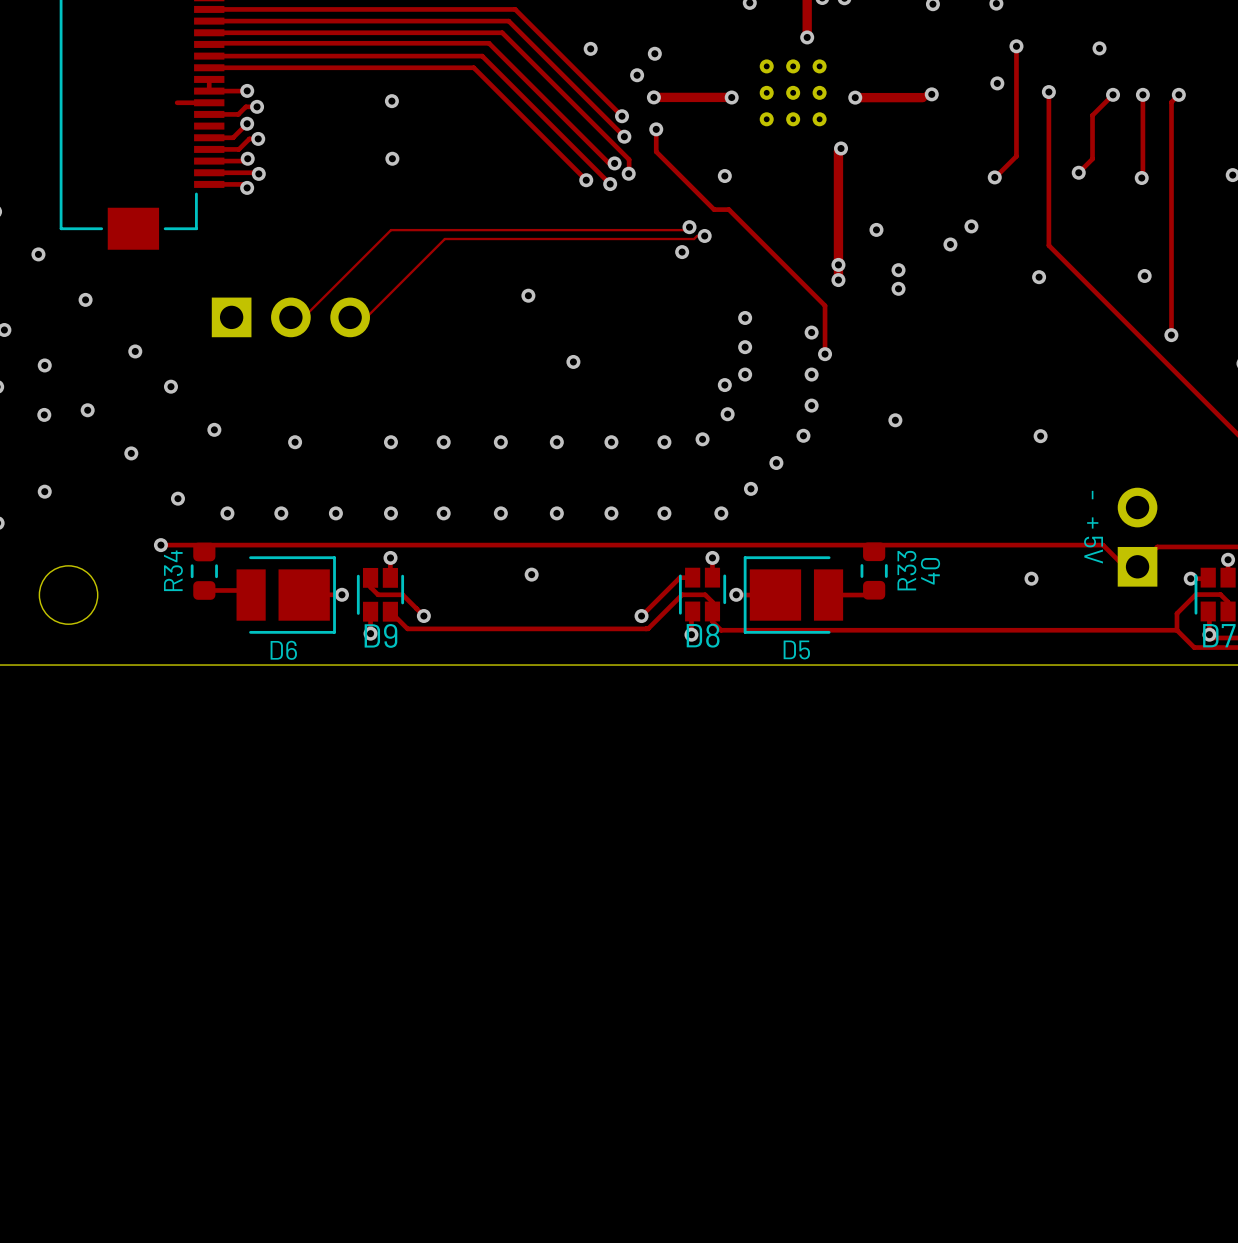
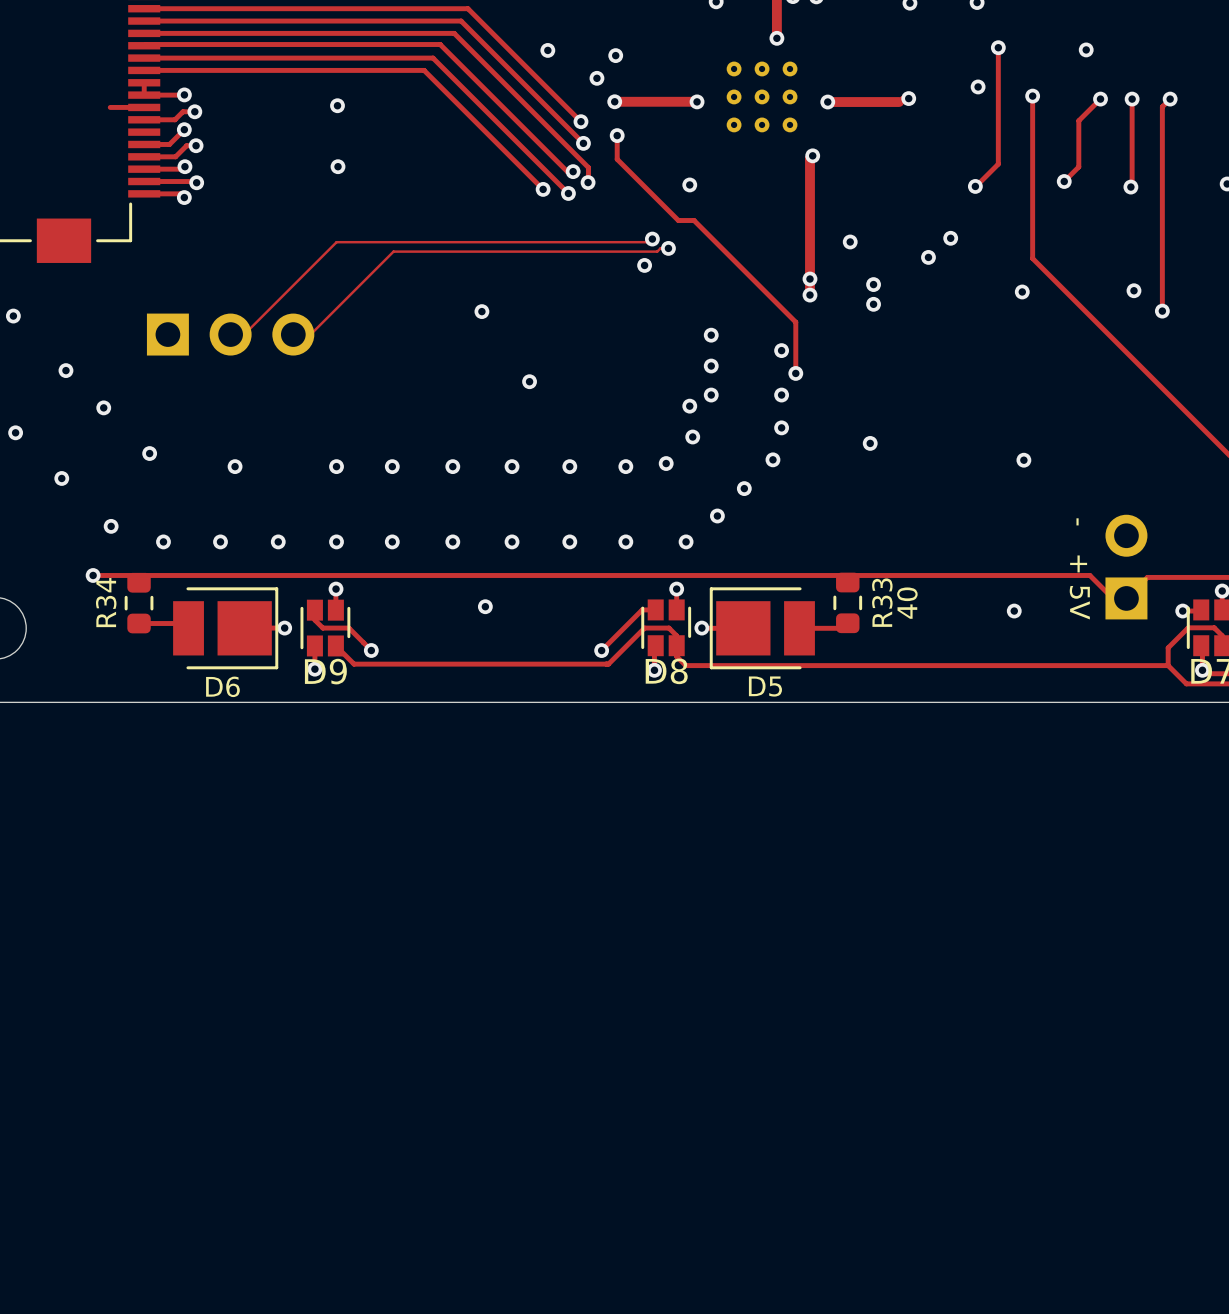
track: (1171, 295) (1171, 335) -> none
via position: (1171, 335) -> (1162, 311)

